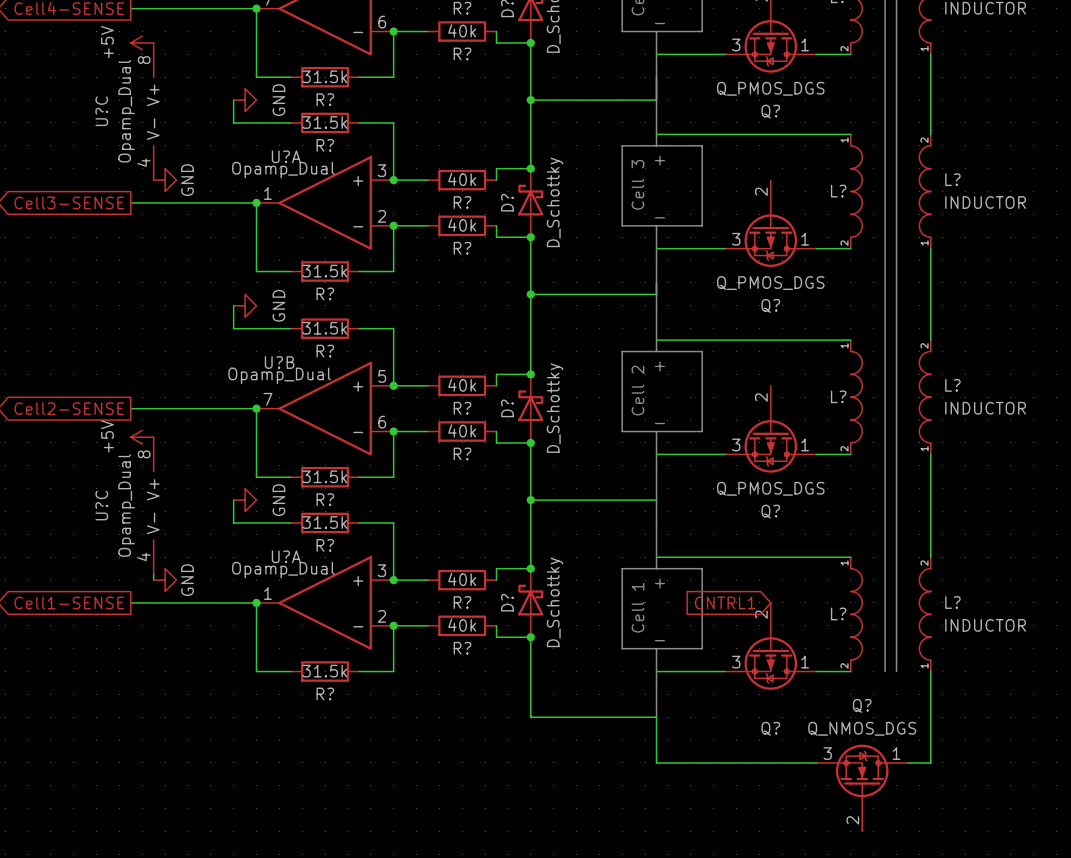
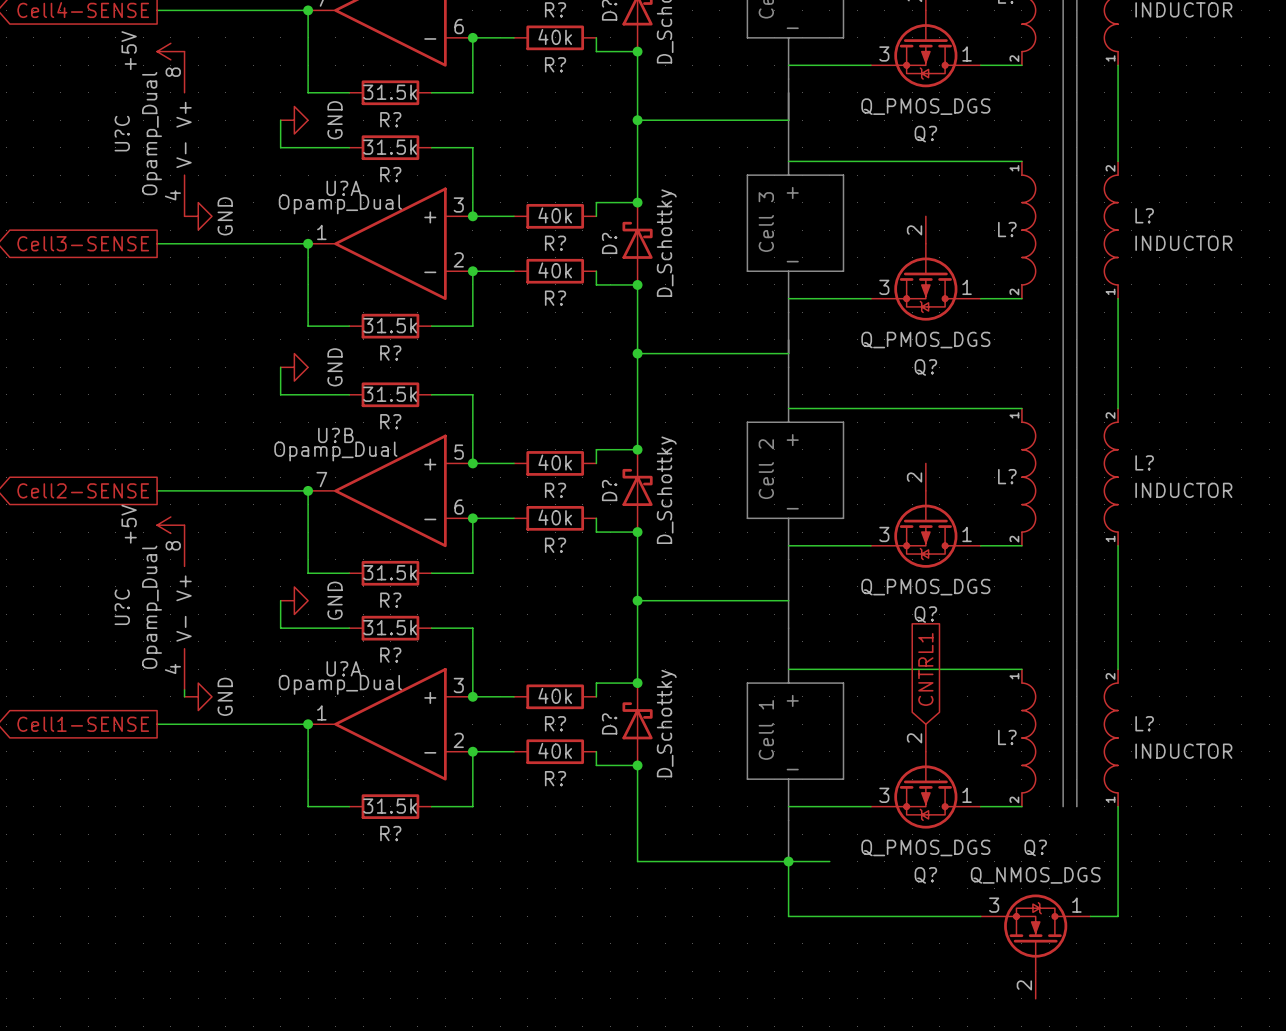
global label rotation: 0° (725, 602) -> 90° clockwise (925, 669)
Q? value: none -> Q_PMOS_DGS (925, 847)
wire: none -> (788, 861) (829, 861)
junction: none -> (788, 861)

